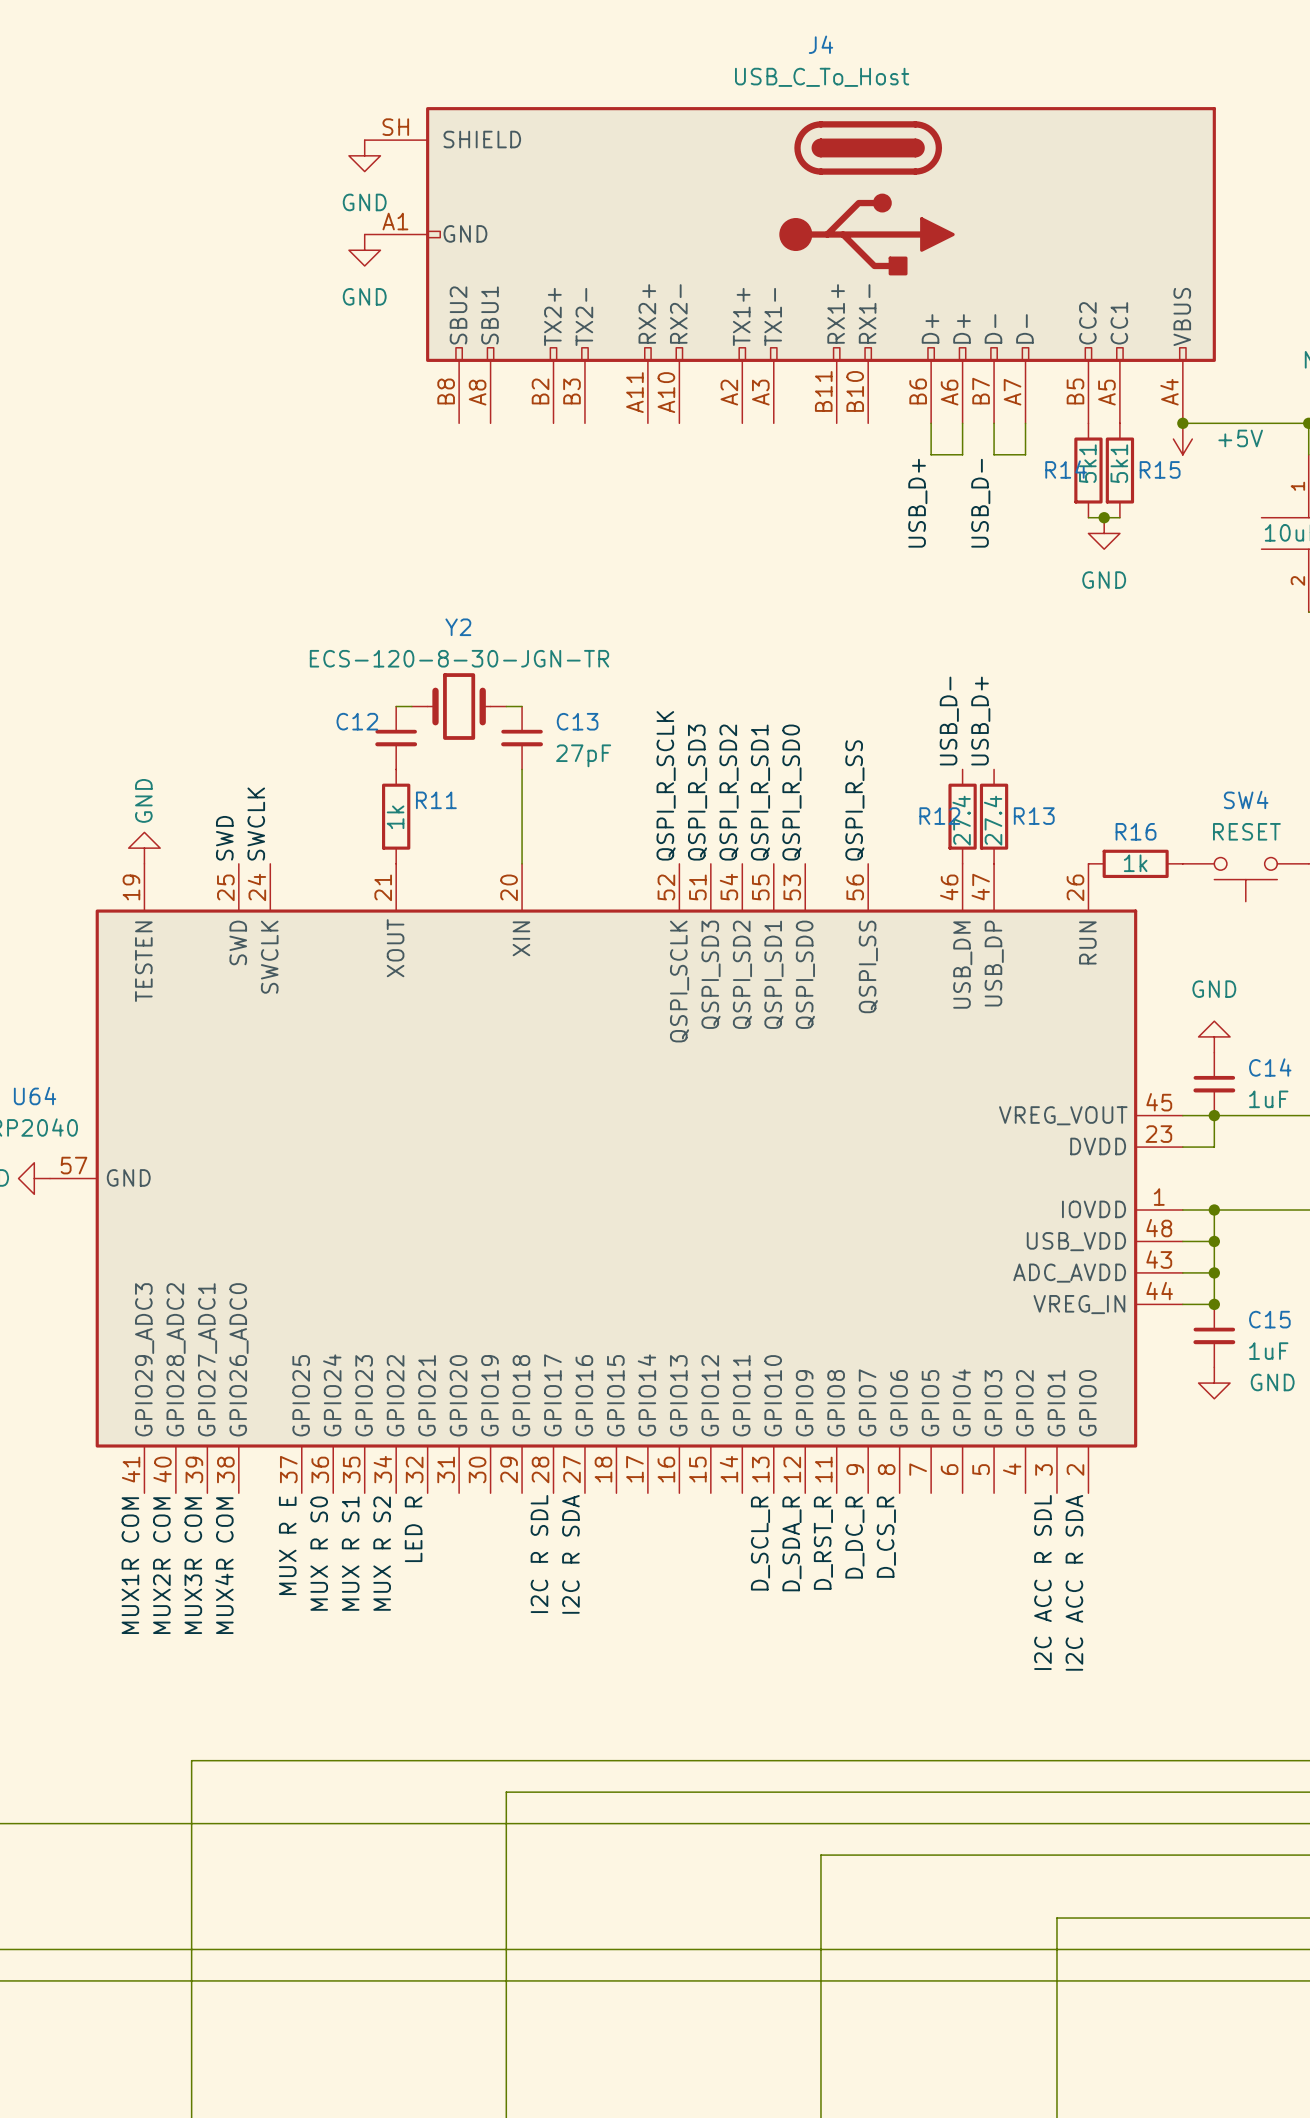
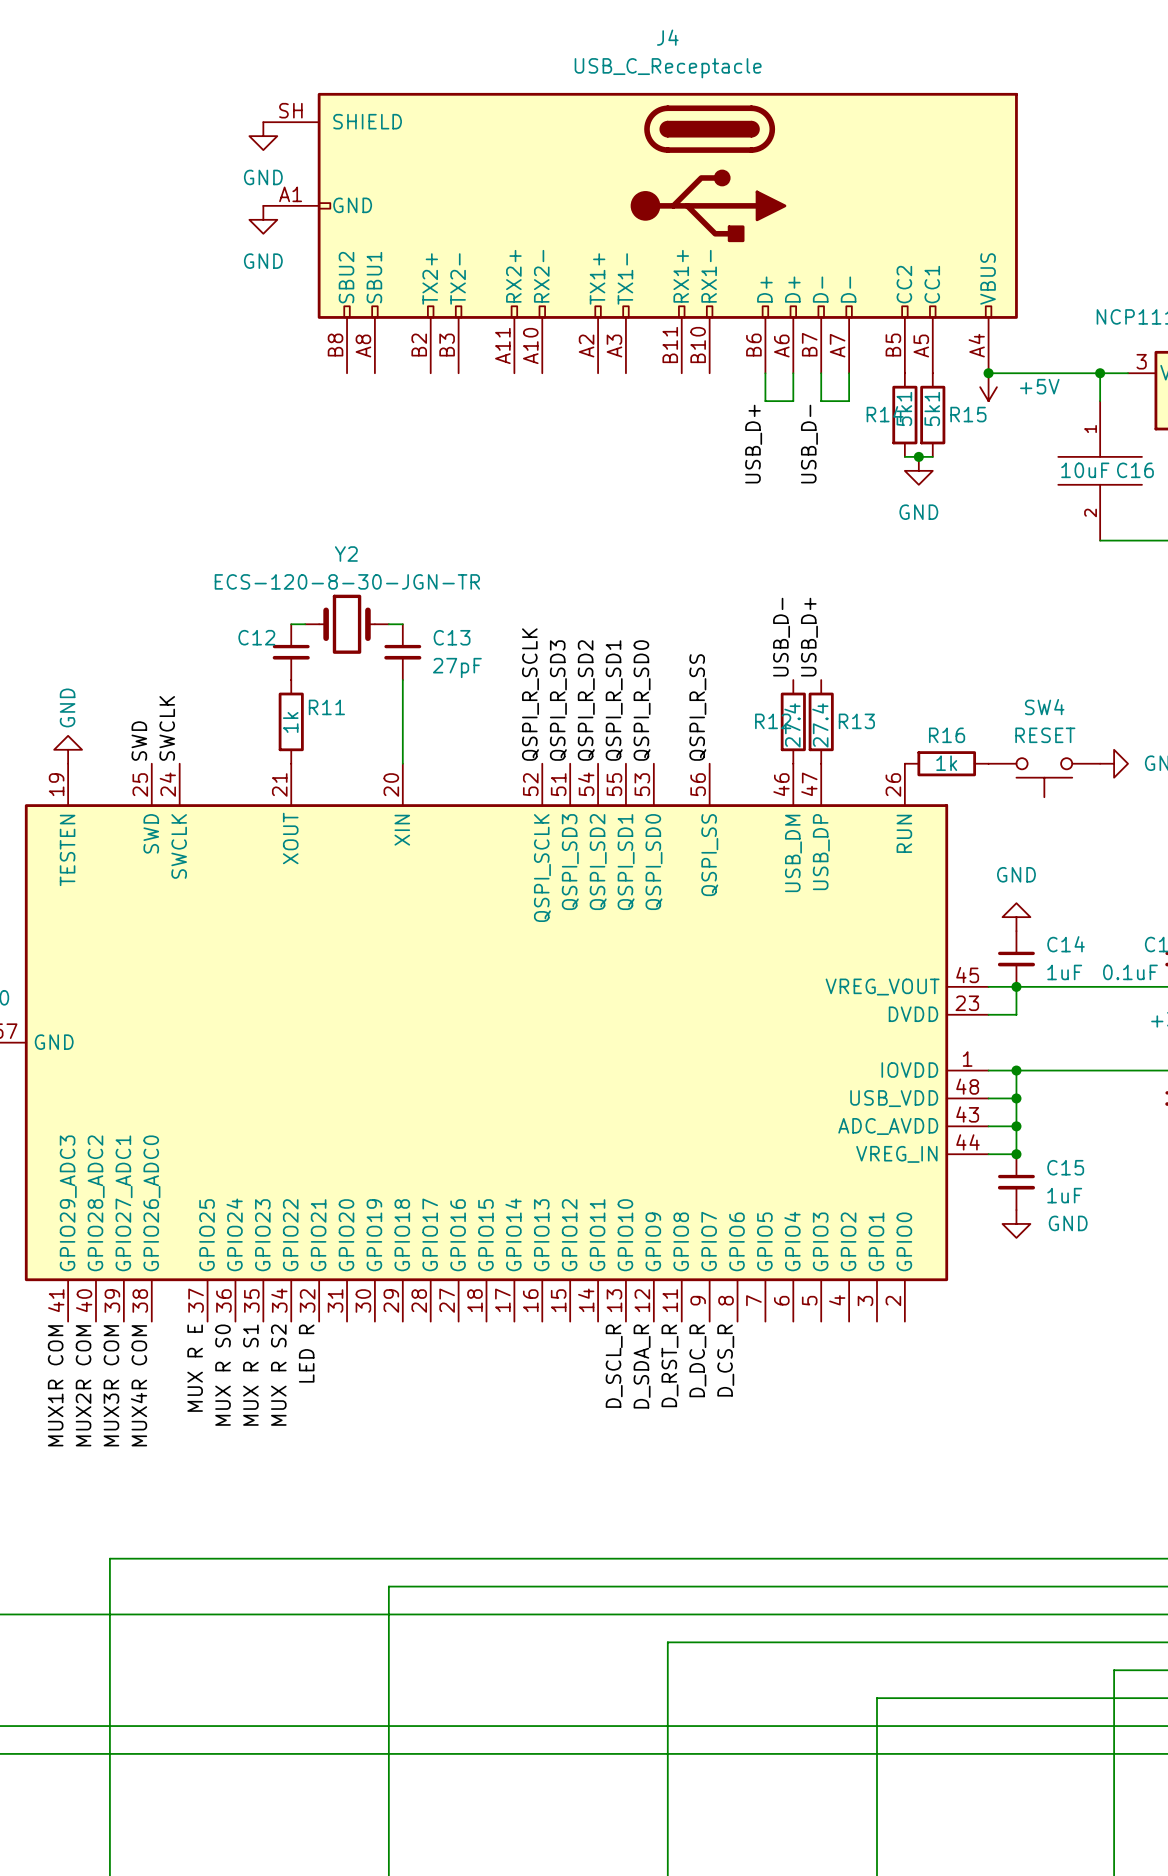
J4 value: USB_C_To_Host (822, 77) -> USB_C_Receptacle (668, 68)
label: I2C R SDL (539, 1554) -> none
label: I2C R SDA (570, 1554) -> none
label: I2C ACC R SDL (1042, 1582) -> none
label: I2C ACC R SDA (1074, 1582) -> none

